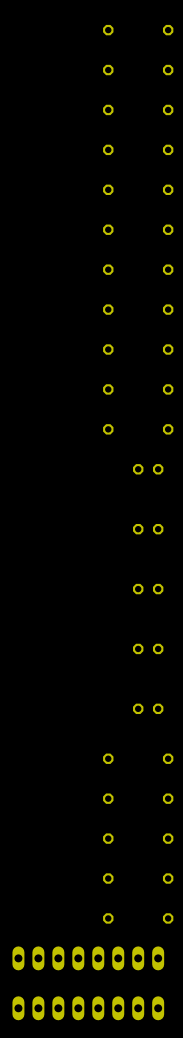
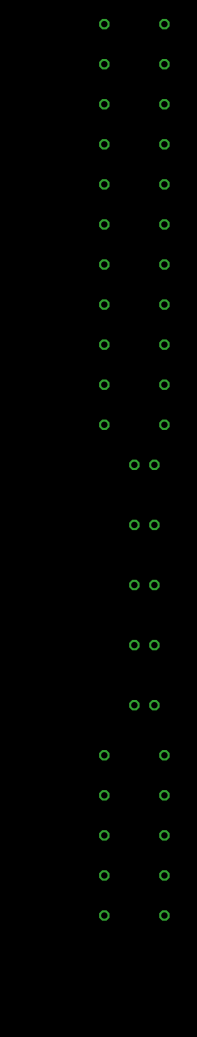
part: (88, 958) -> none
part: (88, 1008) -> none

